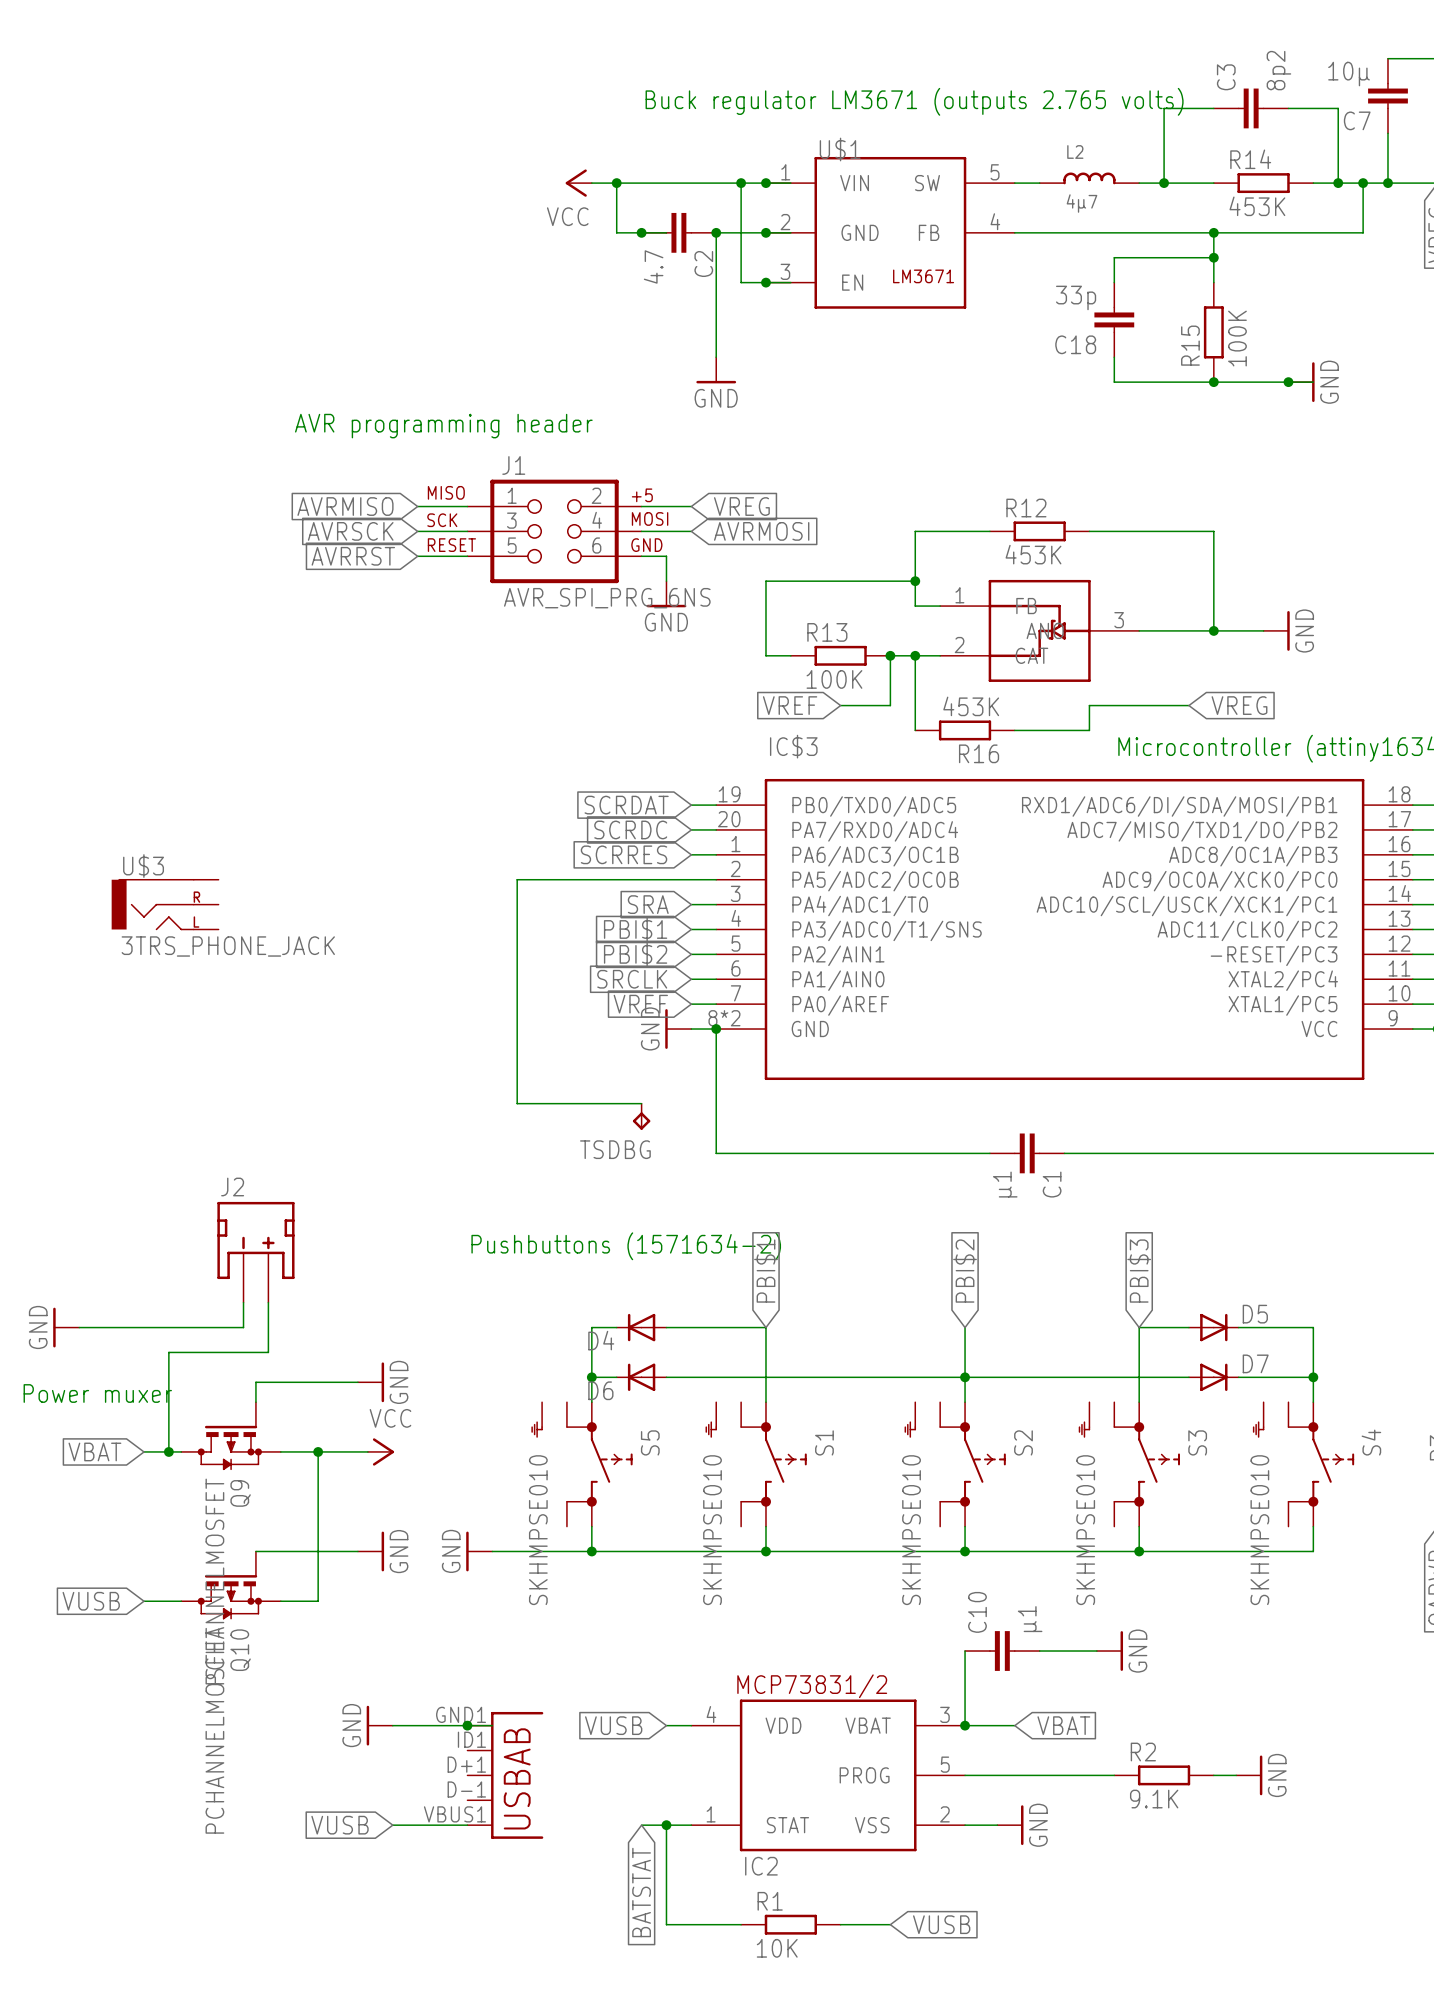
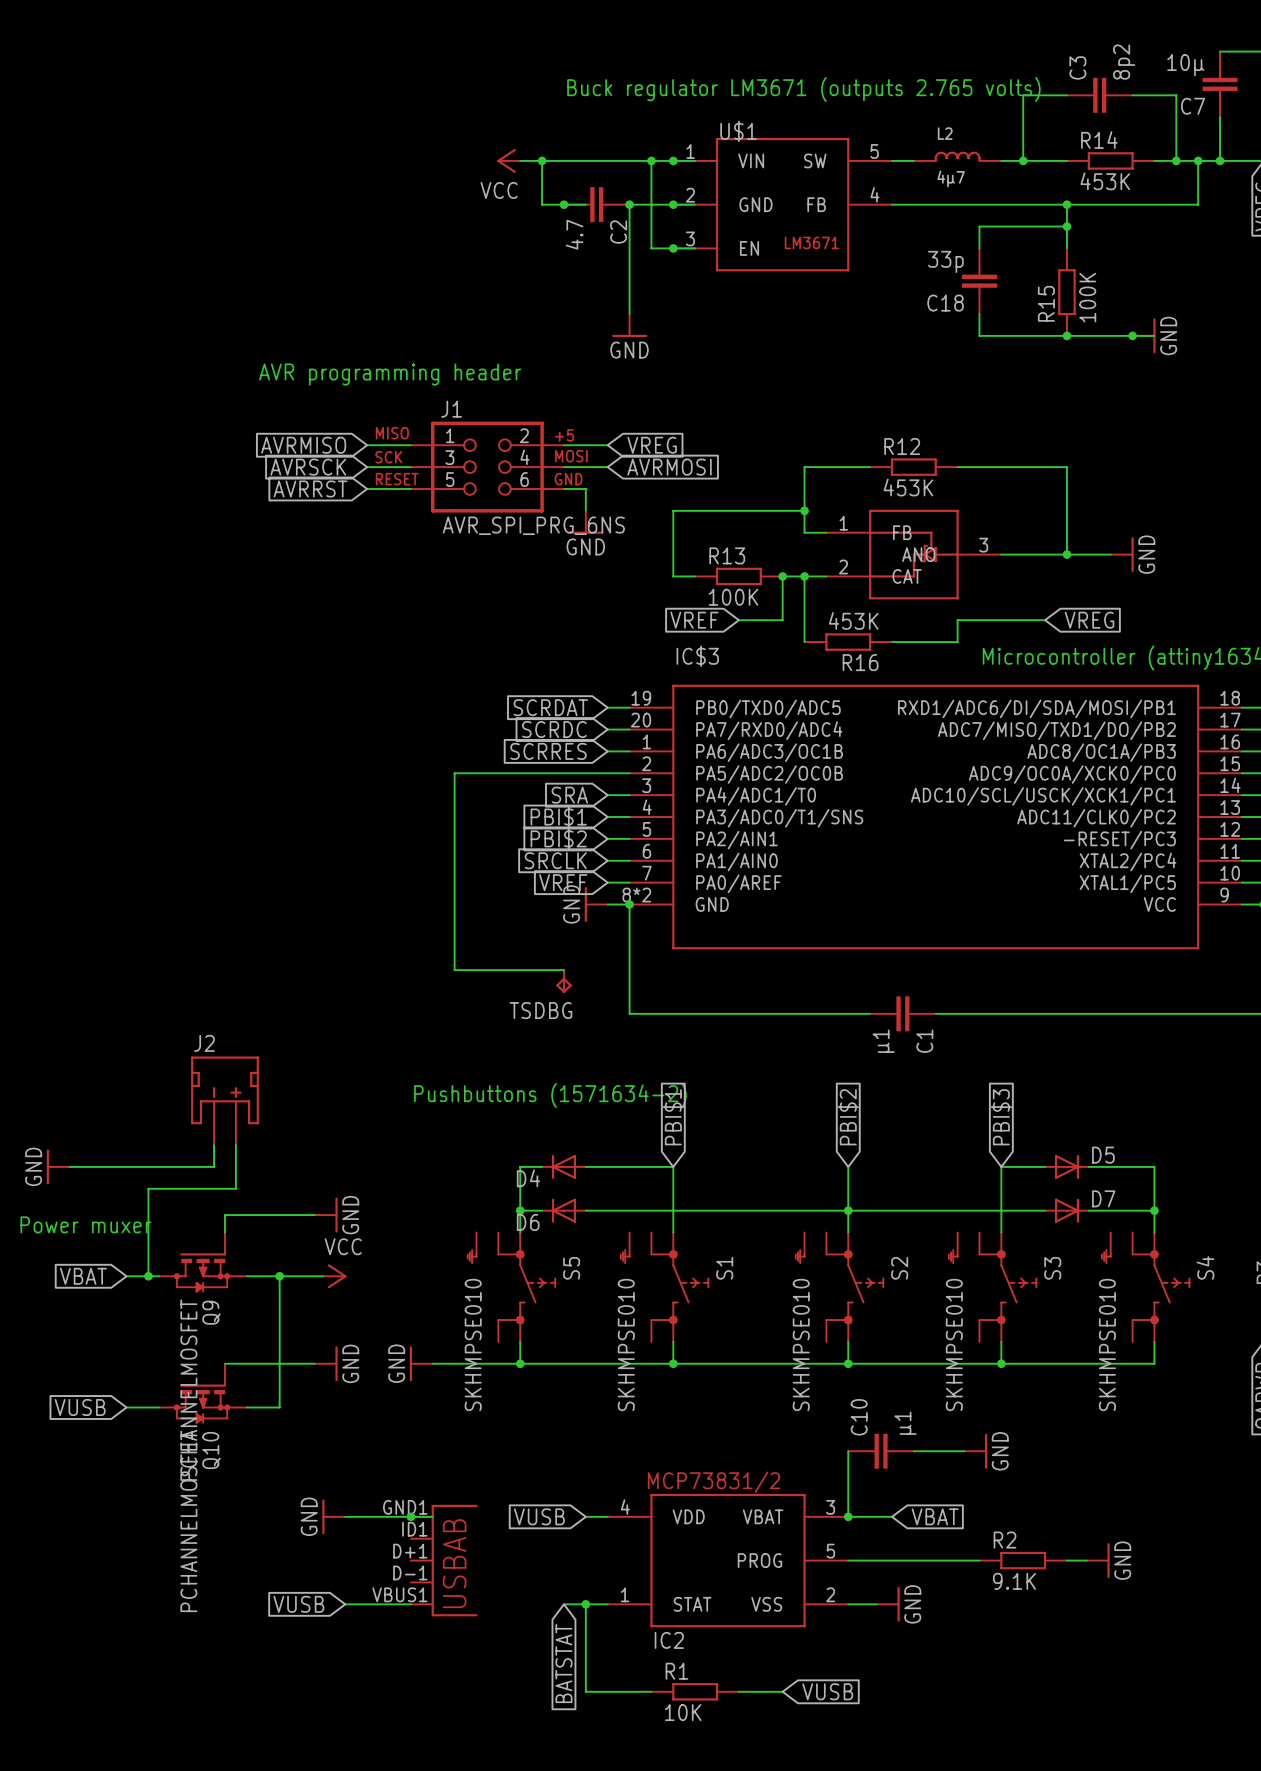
U$3: 3TRS_PHONE_JACK (165, 904) -> none

